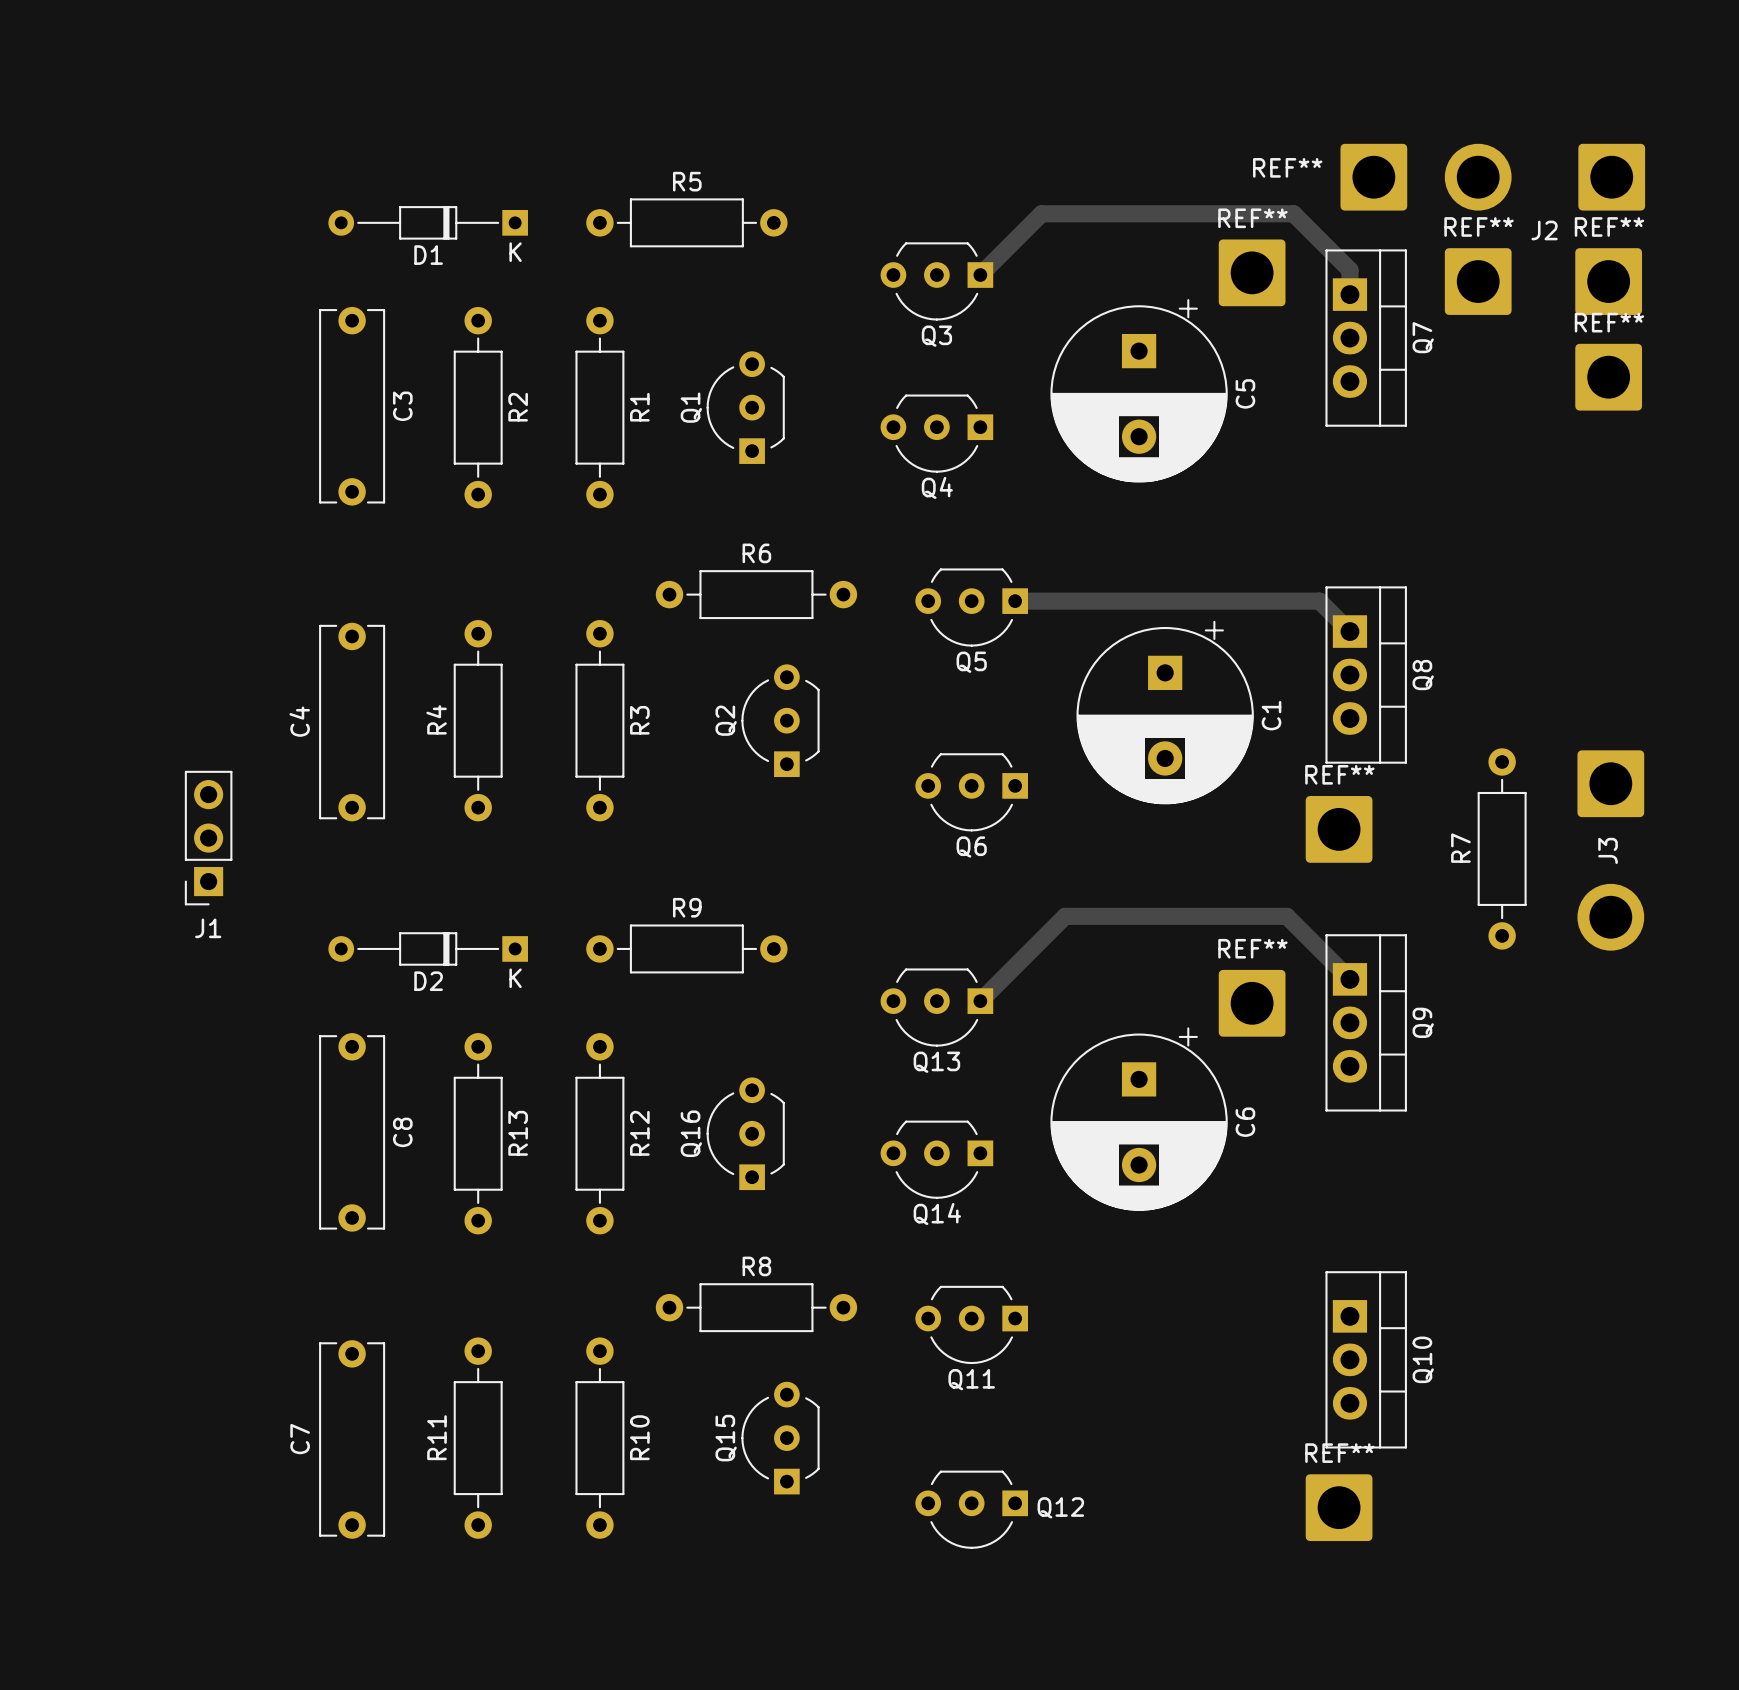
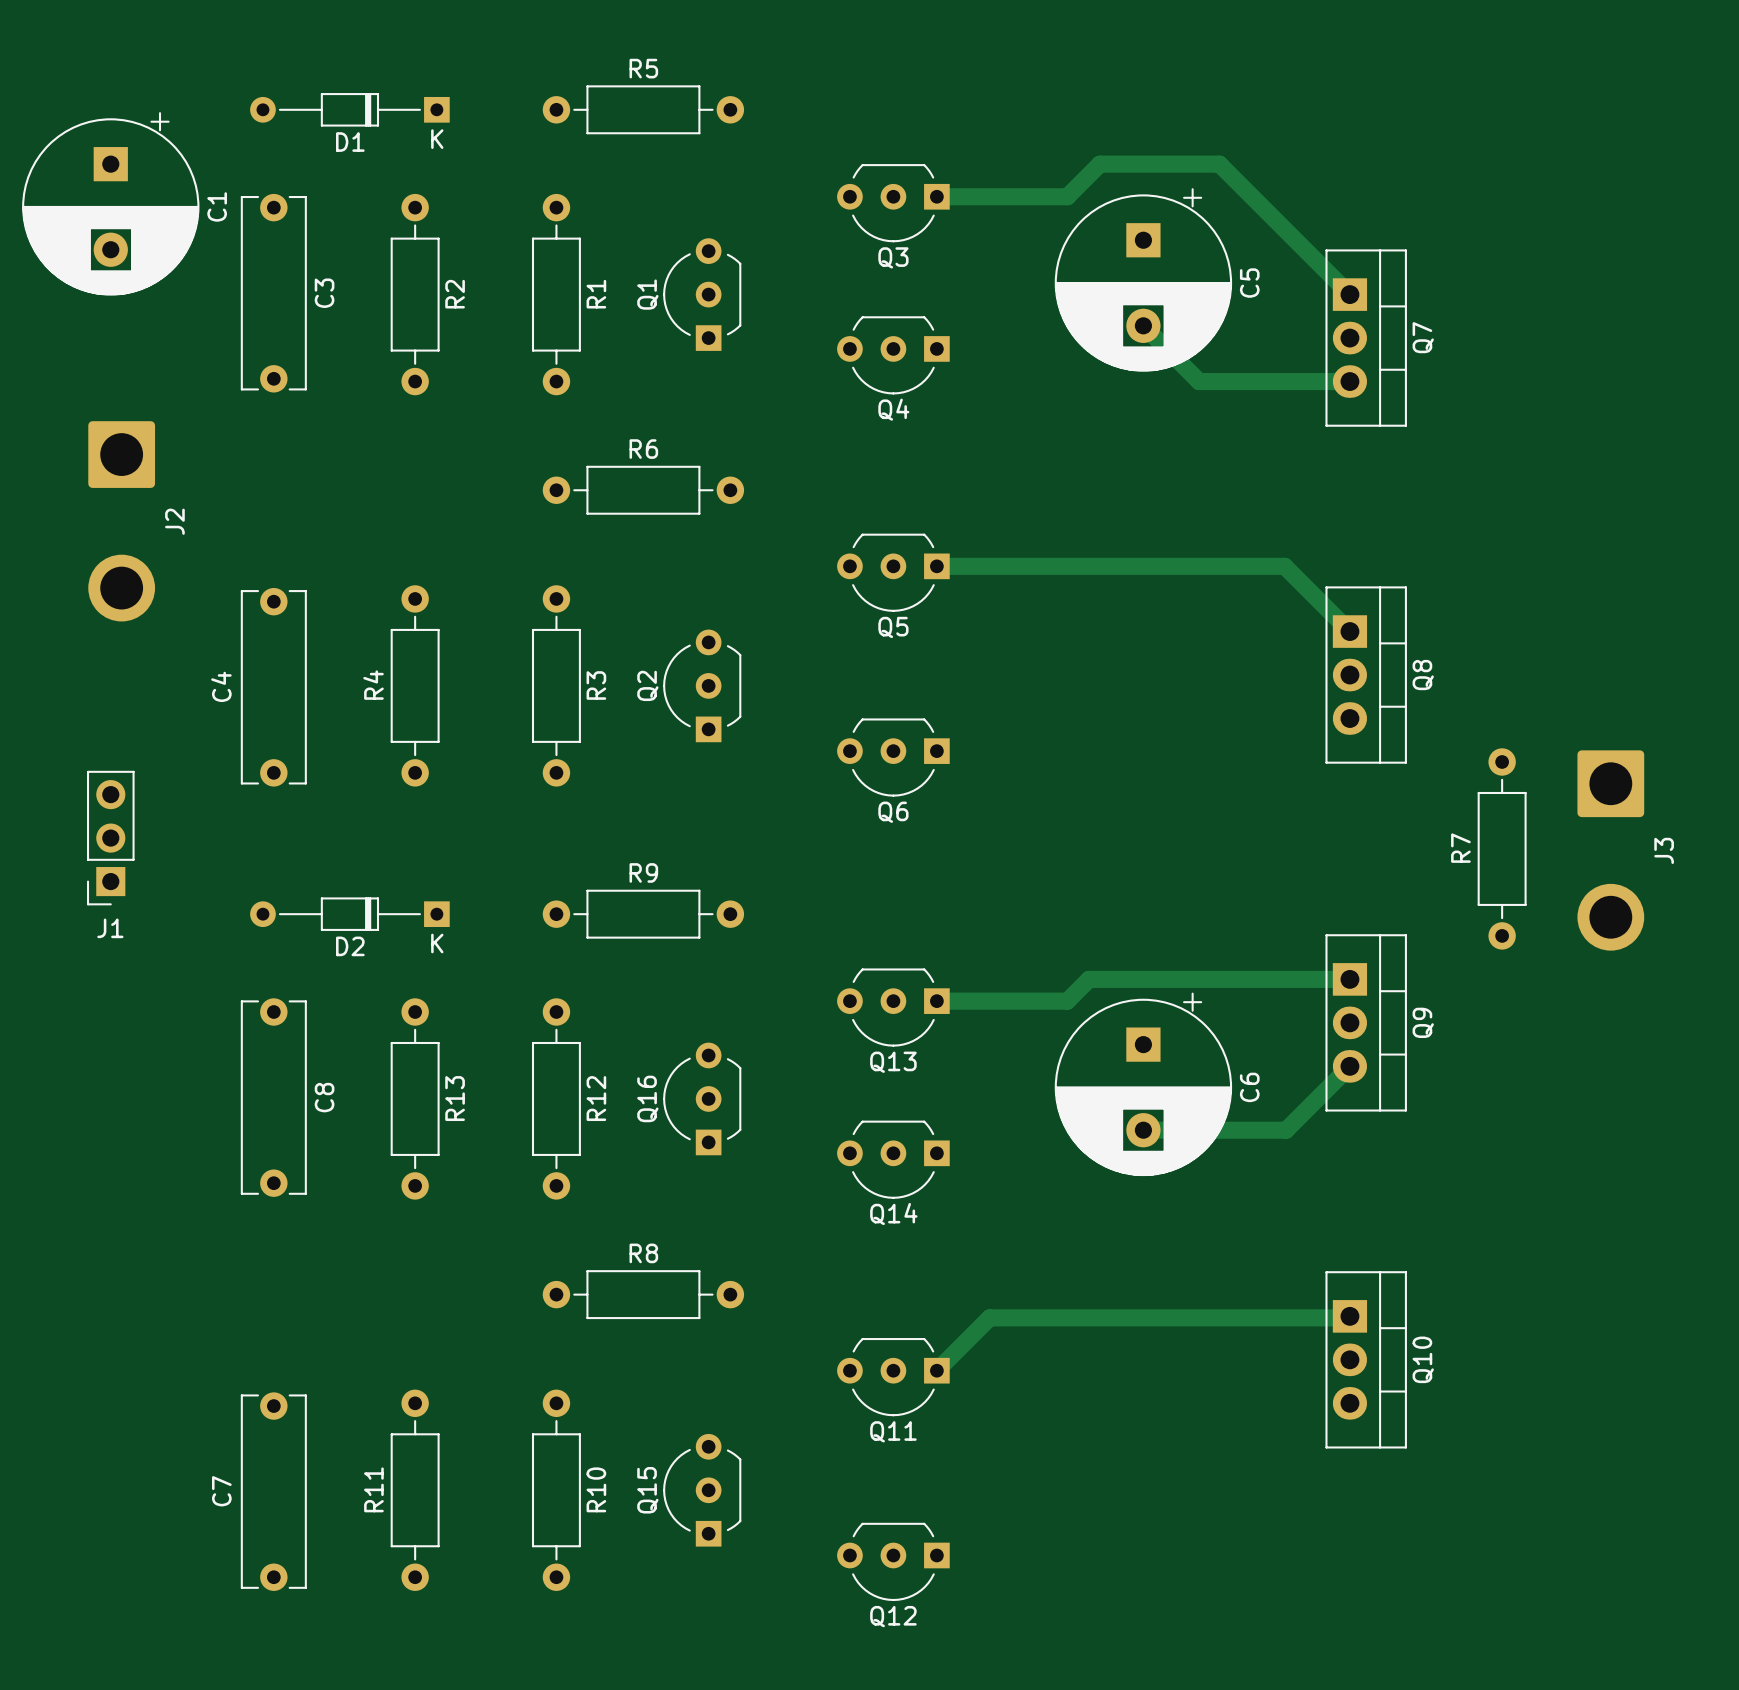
REF**: (1373, 177) -> none
J2 rotation: 0° (1544, 177) -> 90° counterclockwise (121, 521)
J2 position: (1544, 177) -> (121, 521)
D1 position: (428, 222) -> (349, 109)
R5 position: (686, 222) -> (643, 109)
REF**: (1252, 272) -> none
track: (980, 275) (1041, 213) (1293, 213) (1349, 270) (1349, 294) -> (936, 196) (1067, 196) (1099, 164) (1219, 164) (1349, 294)
Q3 position: (936, 281) -> (893, 203)
REF**: (1478, 281) -> none
REF**: (1608, 281) -> none
track: none -> (1143, 325) (1199, 381) (1349, 381)
REF**: (1608, 377) -> none
C5 position: (1139, 390) -> (1143, 279)
C3 position: (352, 406) -> (273, 293)
R2 position: (478, 407) -> (415, 294)
R1 position: (599, 407) -> (556, 294)
Q1 position: (745, 407) -> (702, 294)
Q4 position: (936, 433) -> (893, 355)
R6 position: (756, 594) -> (643, 490)
track: (1015, 601) (1319, 601) -> (936, 566) (1284, 566) (1319, 601)
Q5 position: (971, 607) -> (893, 572)
C1 position: (1165, 712) -> (110, 203)
R4 position: (478, 720) -> (415, 685)
R3 position: (599, 720) -> (556, 685)
Q2 position: (780, 720) -> (702, 685)
C4 position: (352, 722) -> (273, 687)
Q6 position: (971, 792) -> (893, 757)
REF**: (1339, 829) -> none
J1 position: (208, 838) -> (110, 838)
J3 name position: J3 (1608, 850) -> J3 (1664, 850)
D2 position: (428, 948) -> (349, 914)
R9 position: (686, 948) -> (643, 914)
track: (1349, 979) (1286, 916) (1065, 916) (980, 1001) -> (1349, 979) (1089, 979) (1067, 1001) (936, 1001)
REF**: (1252, 1003) -> none
Q13 position: (936, 1007) -> (893, 1007)
track: none -> (1349, 1066) (1286, 1130) (1143, 1130)
C6 position: (1139, 1119) -> (1143, 1084)
C8 position: (352, 1132) -> (273, 1097)
R13 position: (478, 1133) -> (415, 1098)
R12 position: (599, 1133) -> (556, 1098)
Q16 position: (745, 1133) -> (702, 1098)
Q14 position: (936, 1159) -> (893, 1159)
R8 position: (756, 1307) -> (643, 1294)
track: none -> (1348, 1317) (989, 1317) (936, 1370)
Q11 position: (971, 1324) -> (893, 1377)
R11 position: (478, 1438) -> (415, 1490)
R10 position: (599, 1438) -> (556, 1490)
Q15 position: (780, 1438) -> (702, 1490)
C7 position: (352, 1439) -> (273, 1491)
Q12 name position: Q12 (1060, 1507) -> Q12 (893, 1616)
REF**: (1339, 1507) -> none
Q12 position: (971, 1509) -> (893, 1561)

